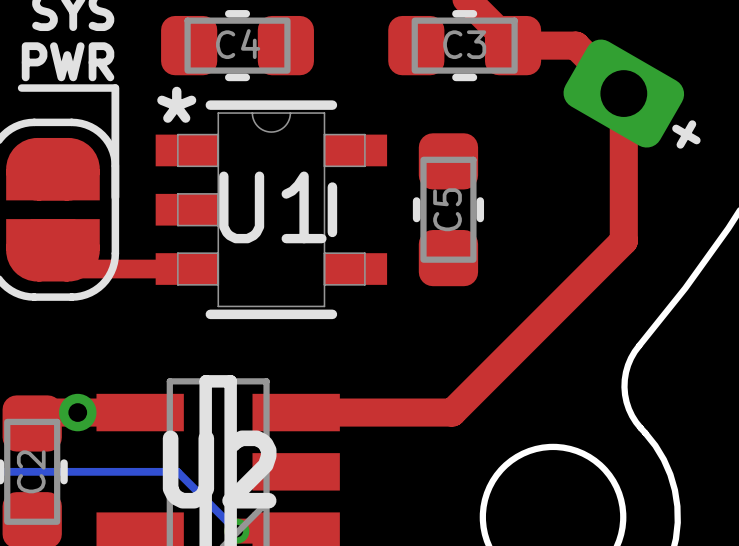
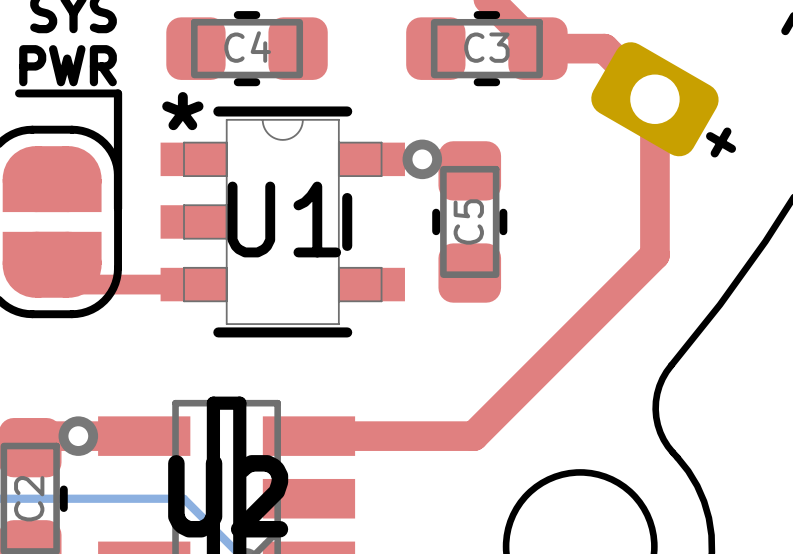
via: none -> (422, 159)

